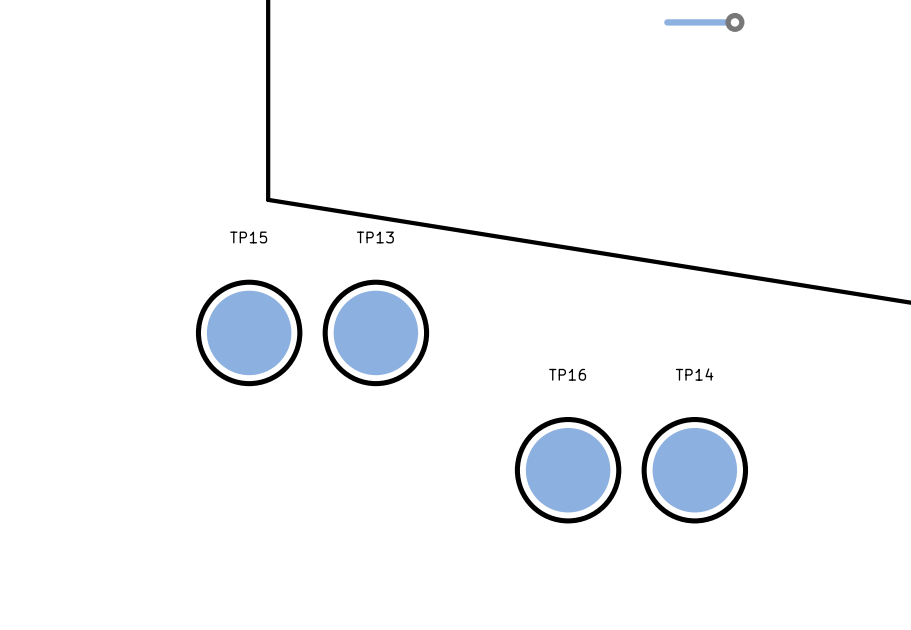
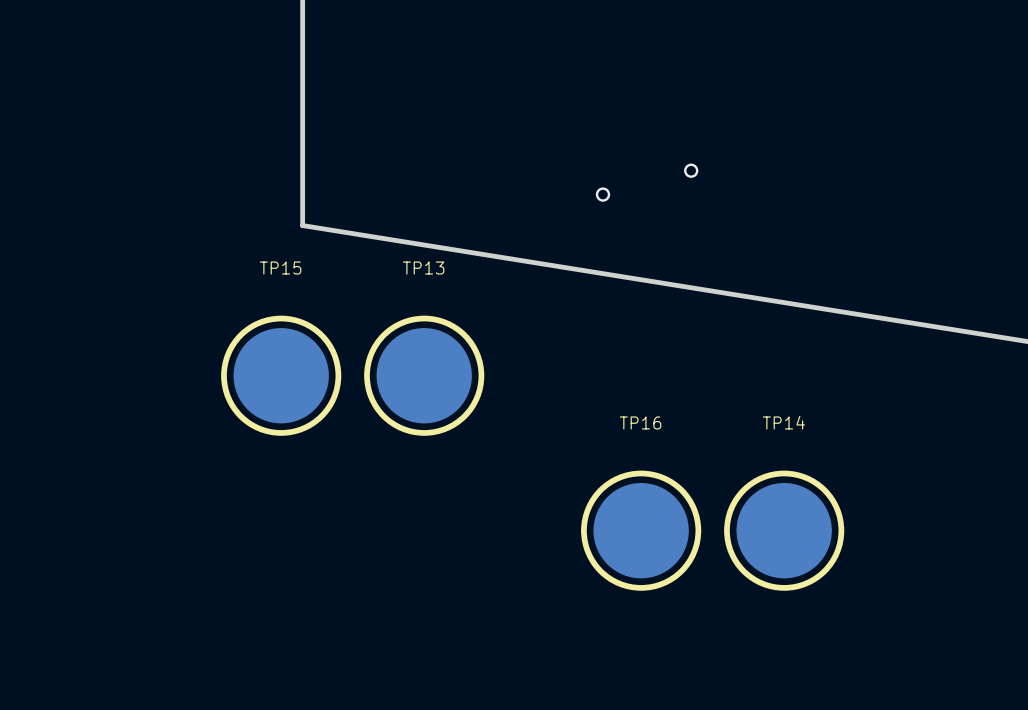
track: (734, 22) (667, 22) -> none
via: (734, 22) -> none
via: none -> (691, 170)
via: none -> (603, 194)

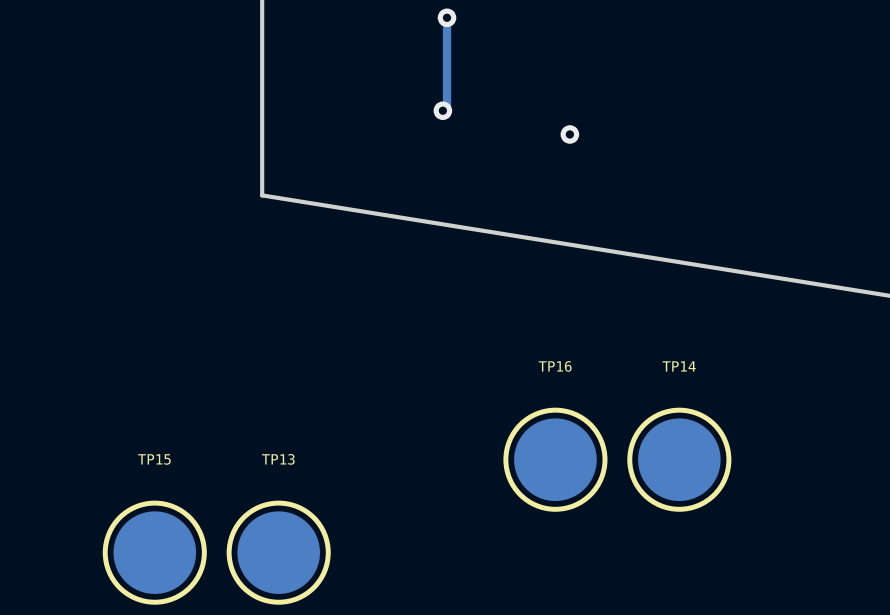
track: none -> (447, 17) (447, 106) (442, 110)
via: none -> (447, 17)
via: none -> (442, 110)
via: none -> (569, 134)
via: (691, 170) -> none
via: (603, 194) -> none
TP15 position: (281, 375) -> (154, 552)
TP13 position: (424, 375) -> (278, 552)

